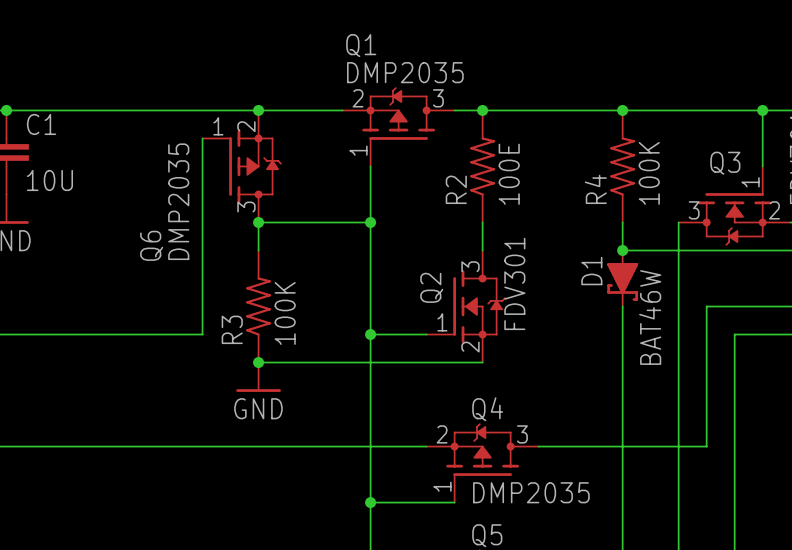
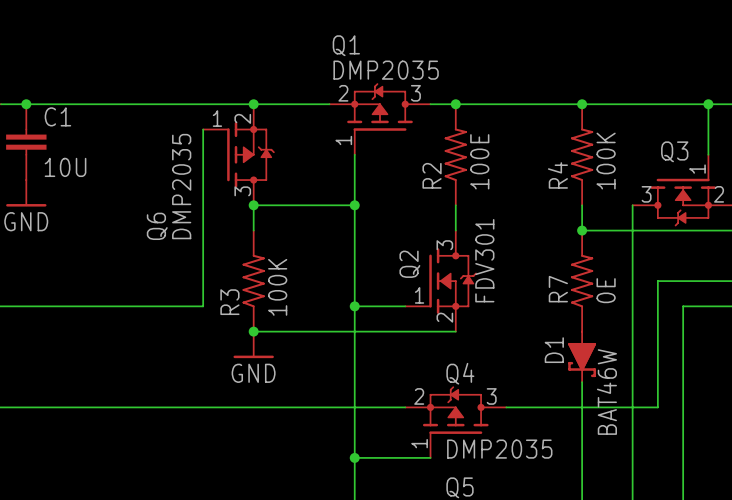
D1 position: (622, 278) -> (582, 356)
R7: none -> 0E (582, 281)

